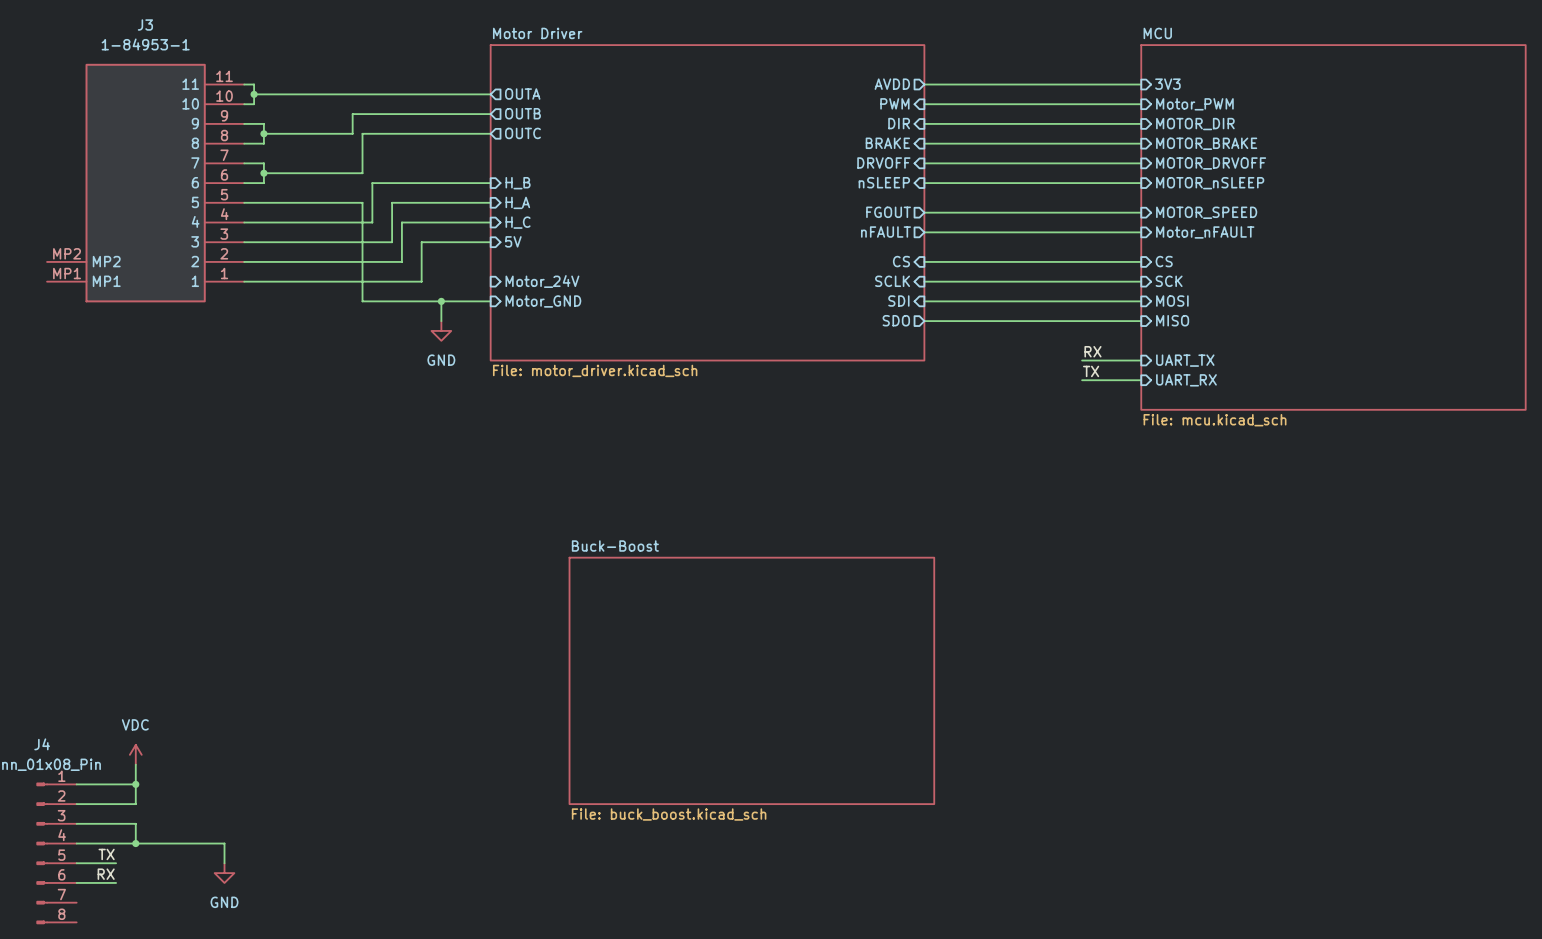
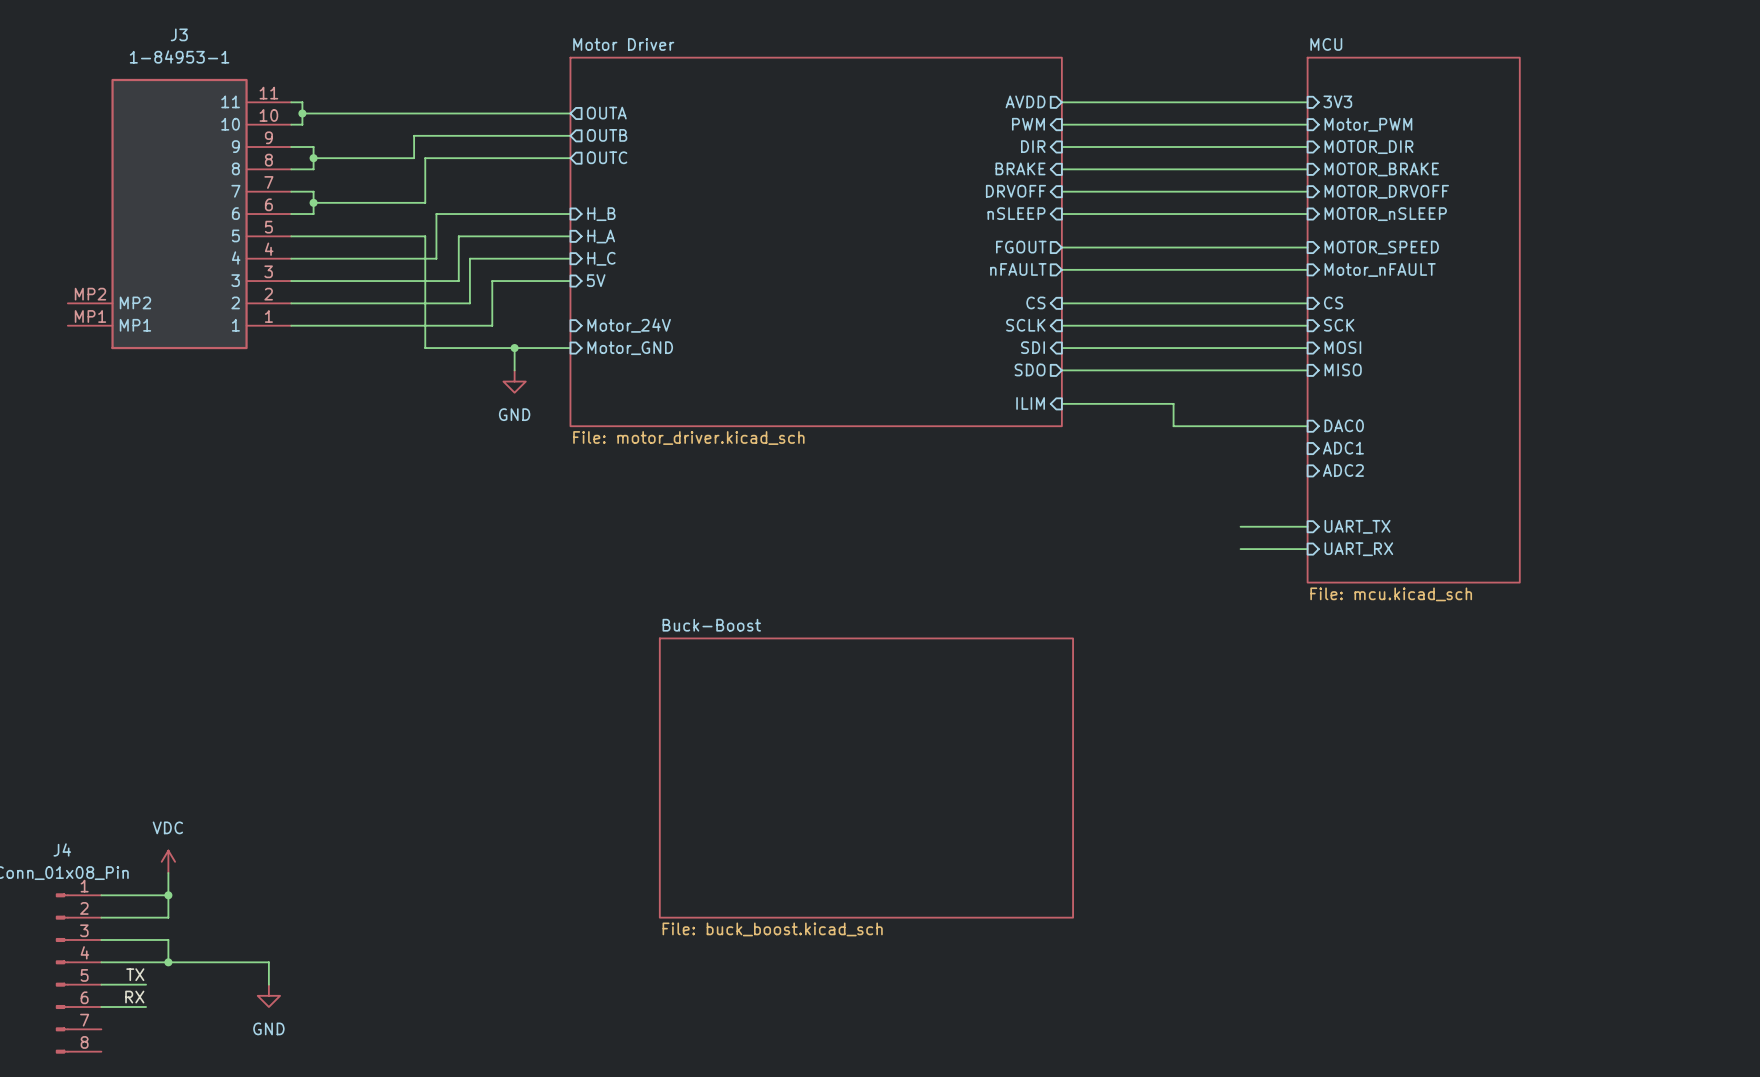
sheet Motor Driver shape: [490, 44, 925, 362] -> [569, 56, 1063, 427]
sheet MCU: File: mcu.kicad_sch (1333, 227) -> none
sheet MCU: none -> File: mcu.kicad_sch (1413, 320)
sheet pin: none -> ILIM (1030, 403)
wire: none -> (1061, 403) (1173, 403) (1173, 426) (1307, 426)
label: RX (1092, 351) -> none
wire: (1082, 360) (1141, 360) -> (1240, 526) (1307, 526)
sheet pin position: UART_TX (1185, 360) -> UART_TX (1357, 526)
sheet pin: none -> DAC0 (1344, 425)
label: TX (1091, 371) -> none
wire: (1082, 380) (1141, 380) -> (1240, 549) (1307, 549)
sheet pin position: UART_RX (1186, 380) -> UART_RX (1358, 549)
sheet pin: none -> ADC1 (1343, 448)
sheet pin: none -> ADC2 (1343, 470)

